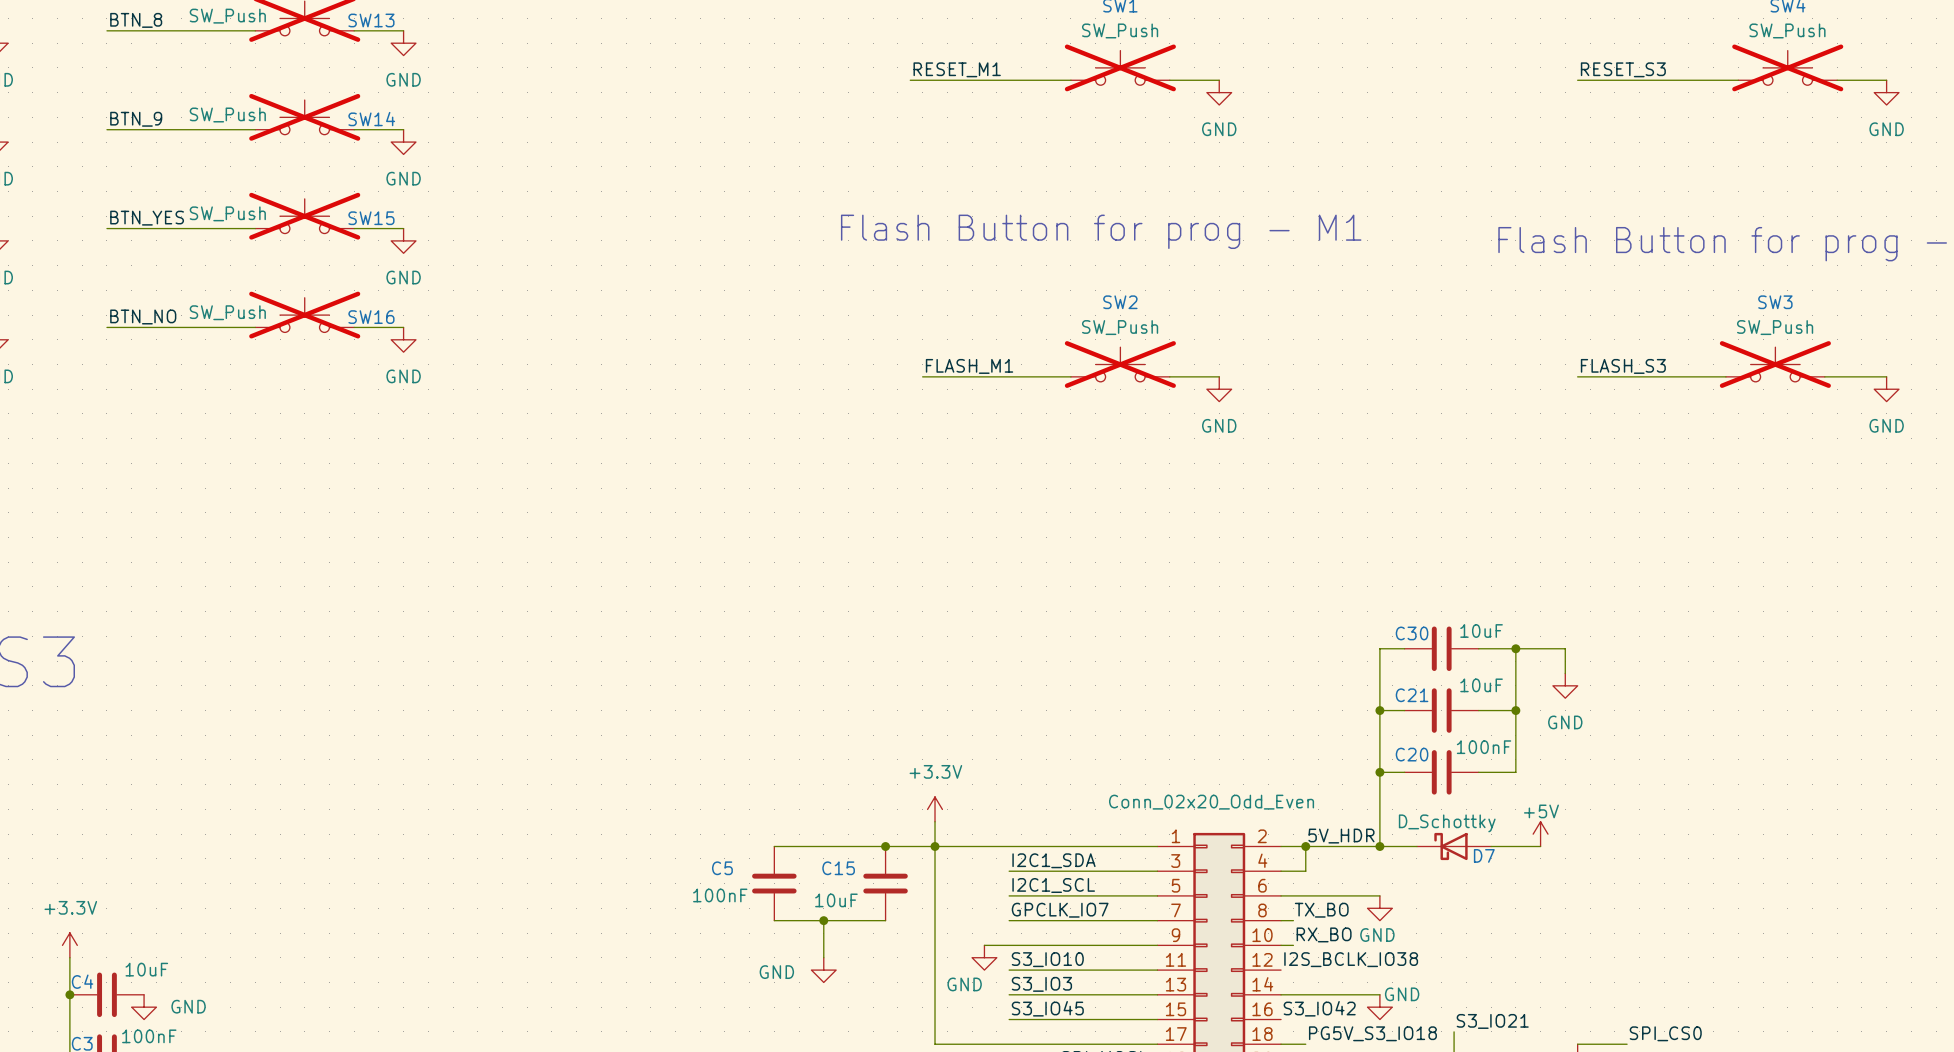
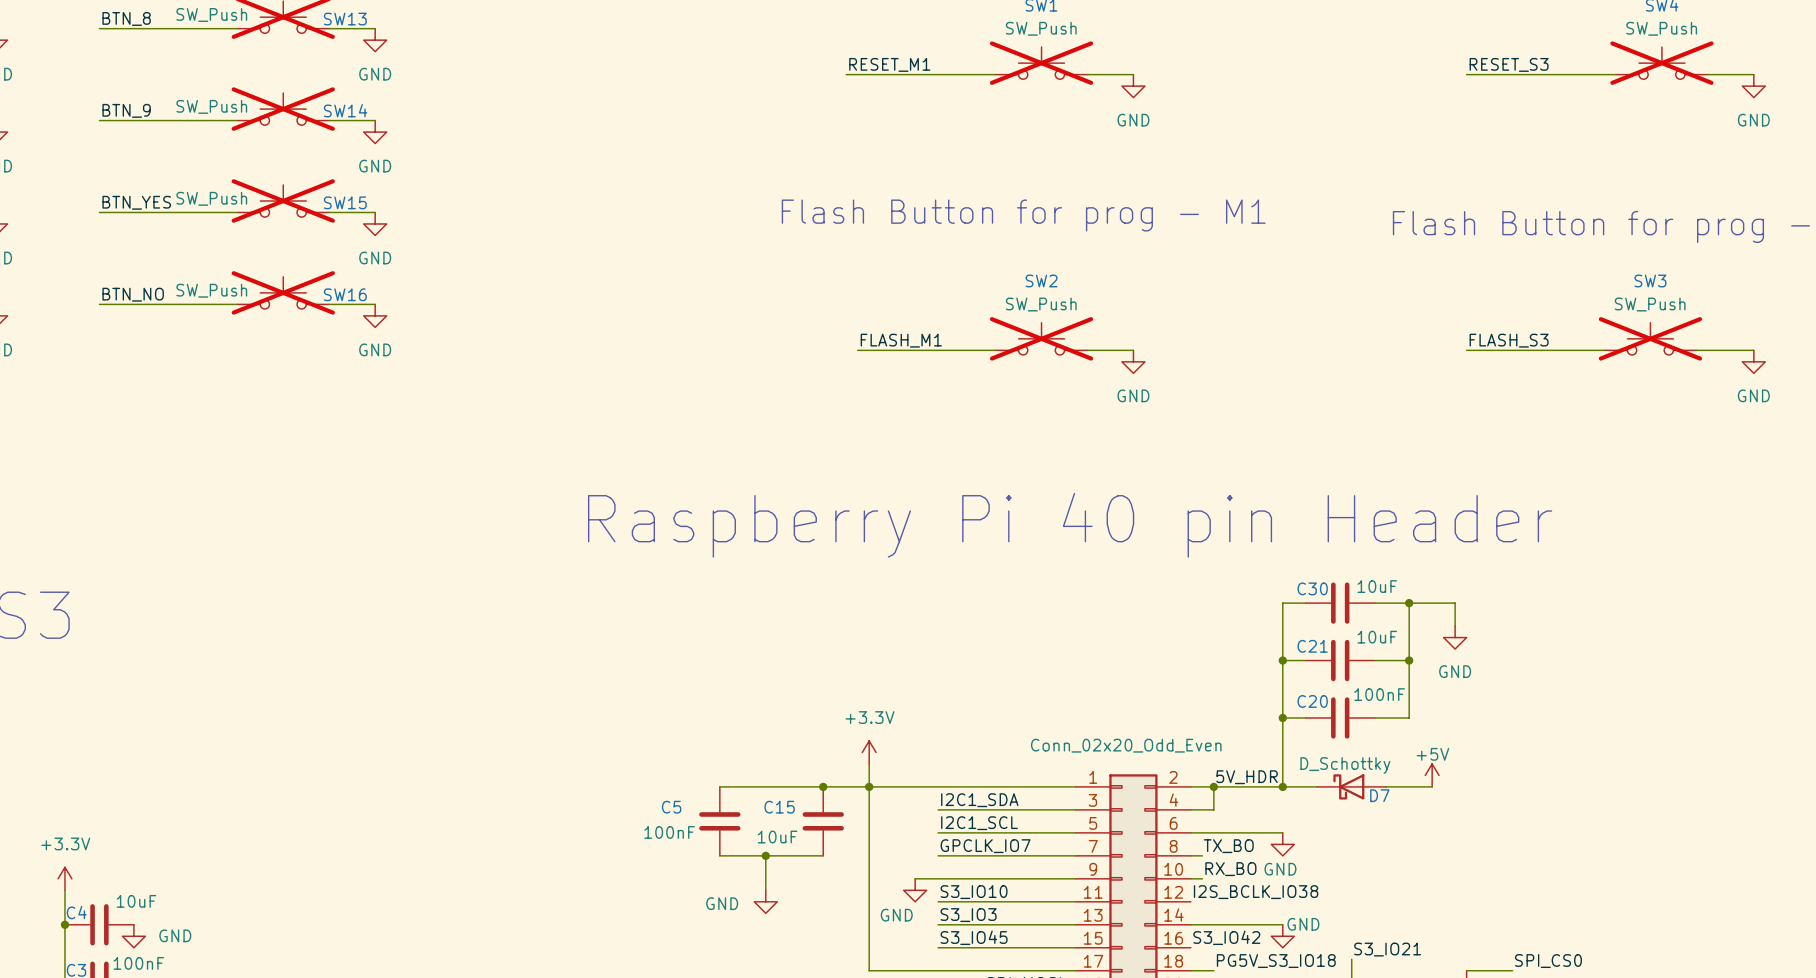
text: none -> Raspberry Pi 40 pin Header (1070, 525)

